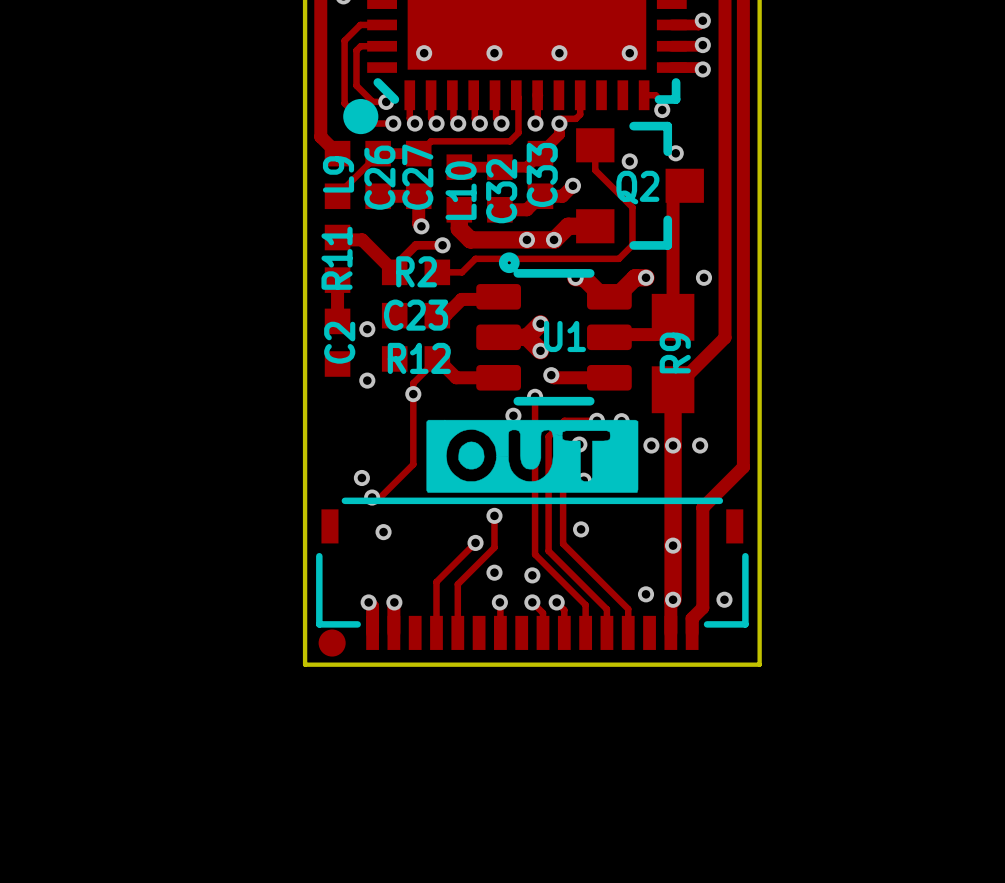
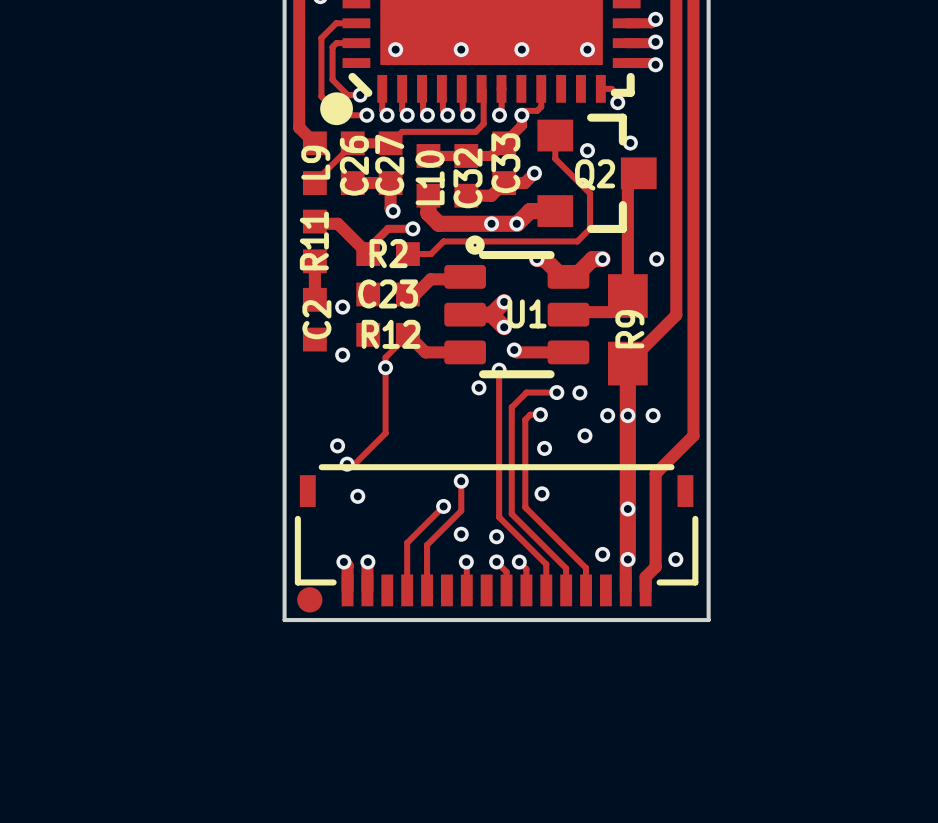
drawing: [426, 419, 639, 493] -> none

